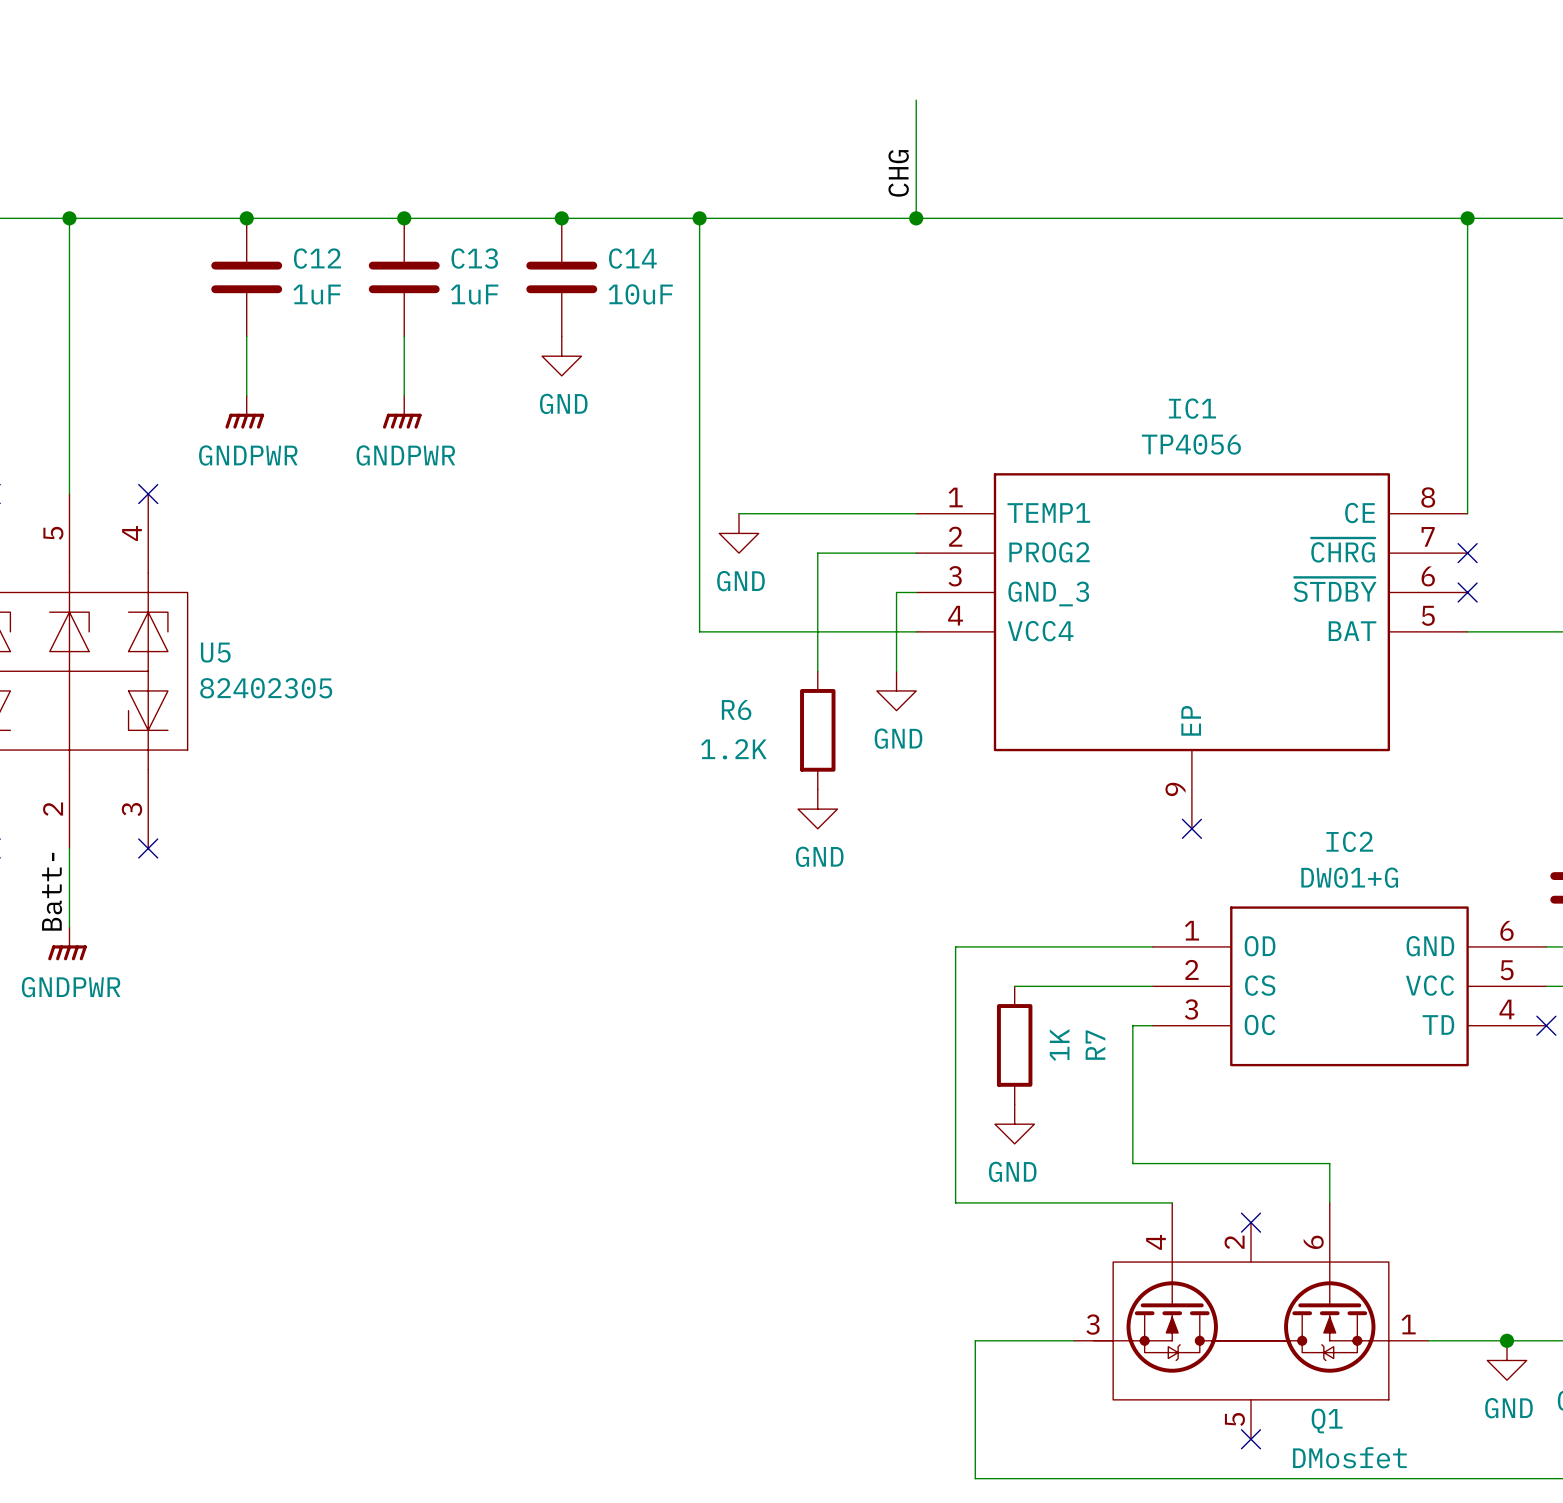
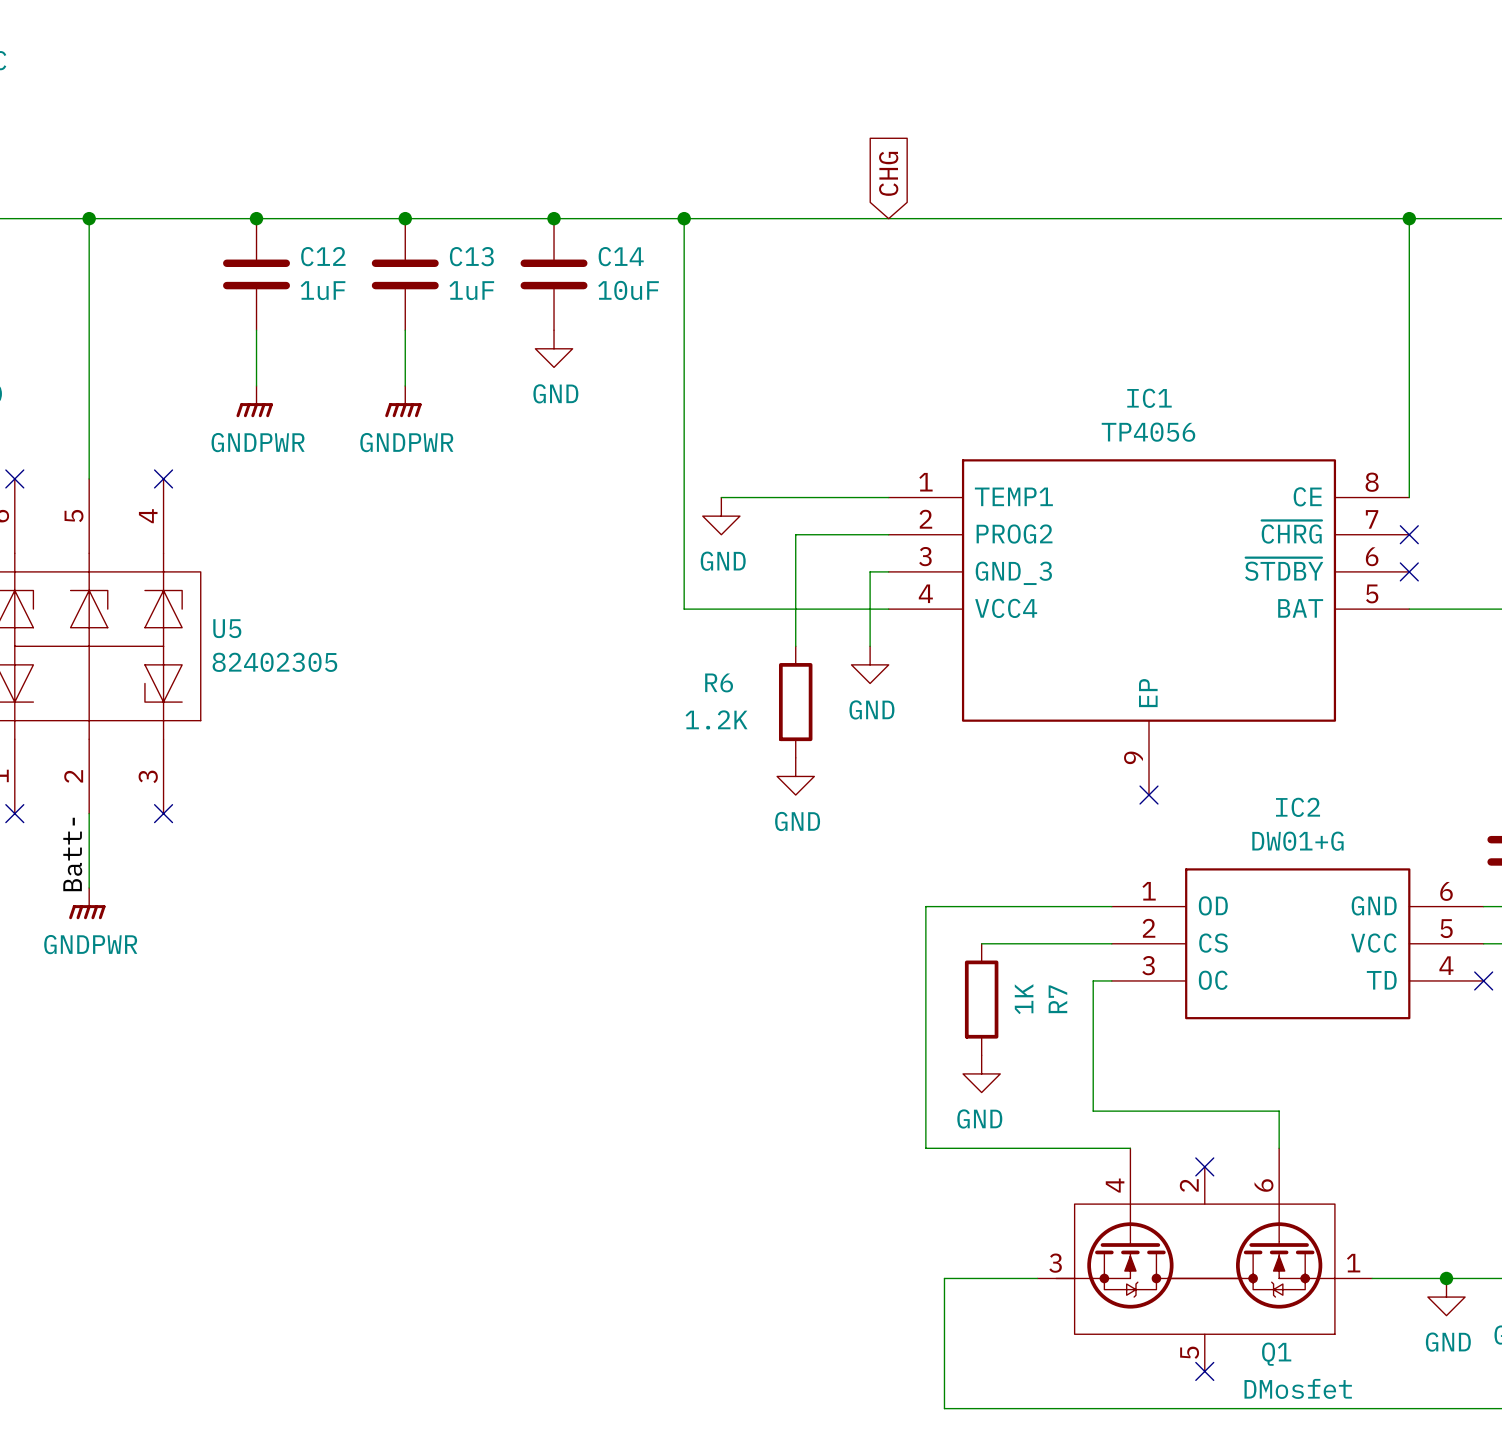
wire: (916, 100) (916, 218) -> none
global label: none -> CHG (888, 173)
label: CHG (898, 173) -> none
junction: (916, 218) -> none

